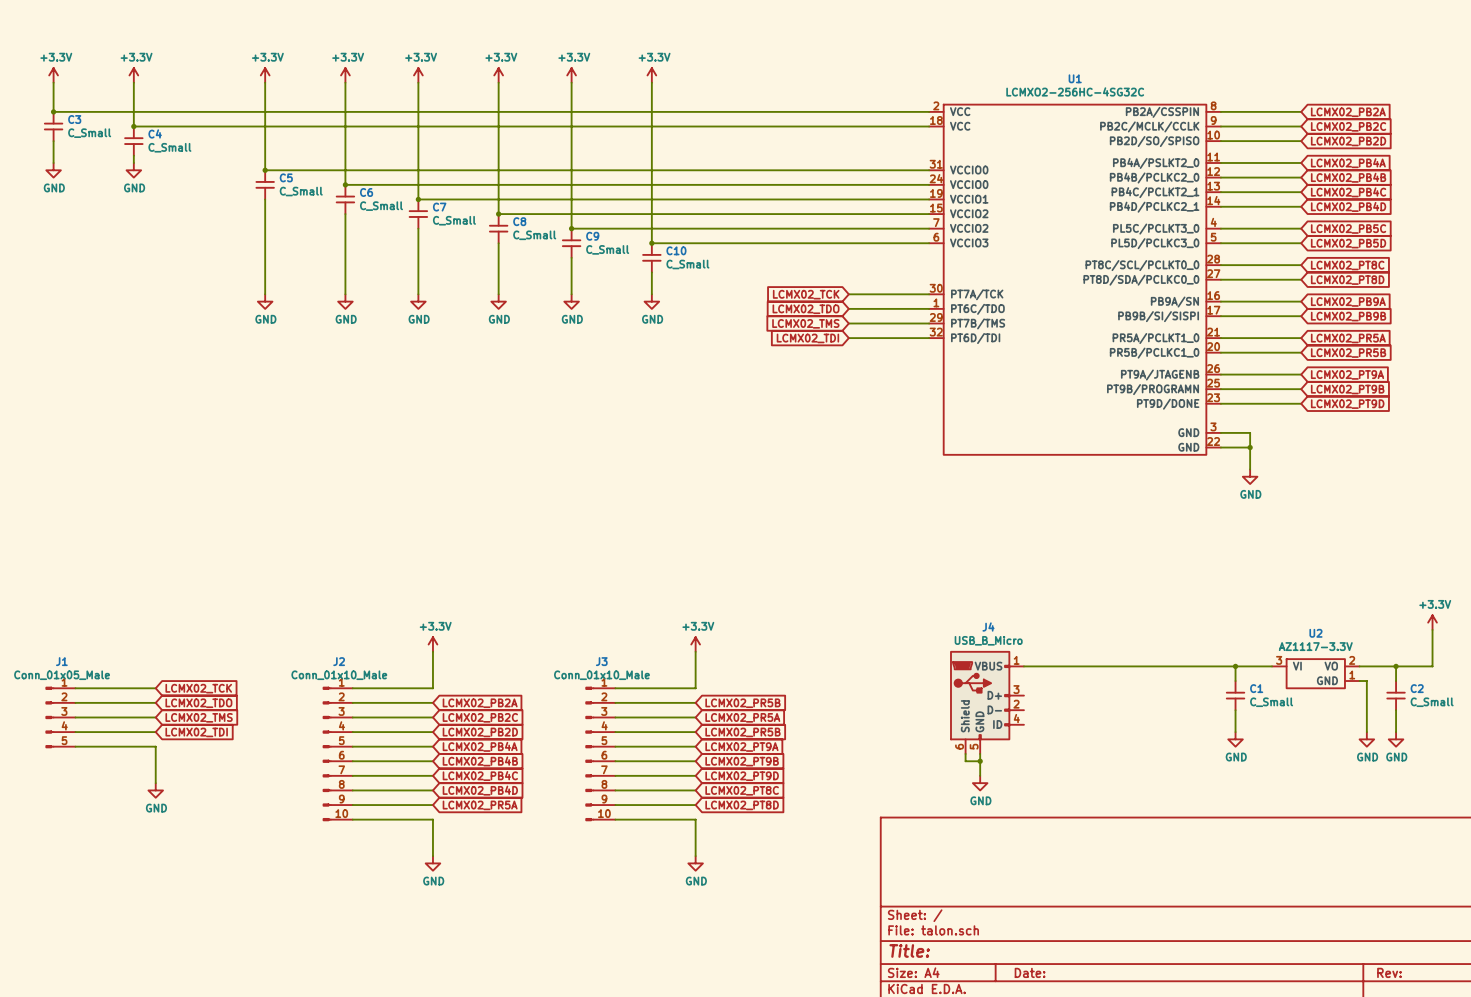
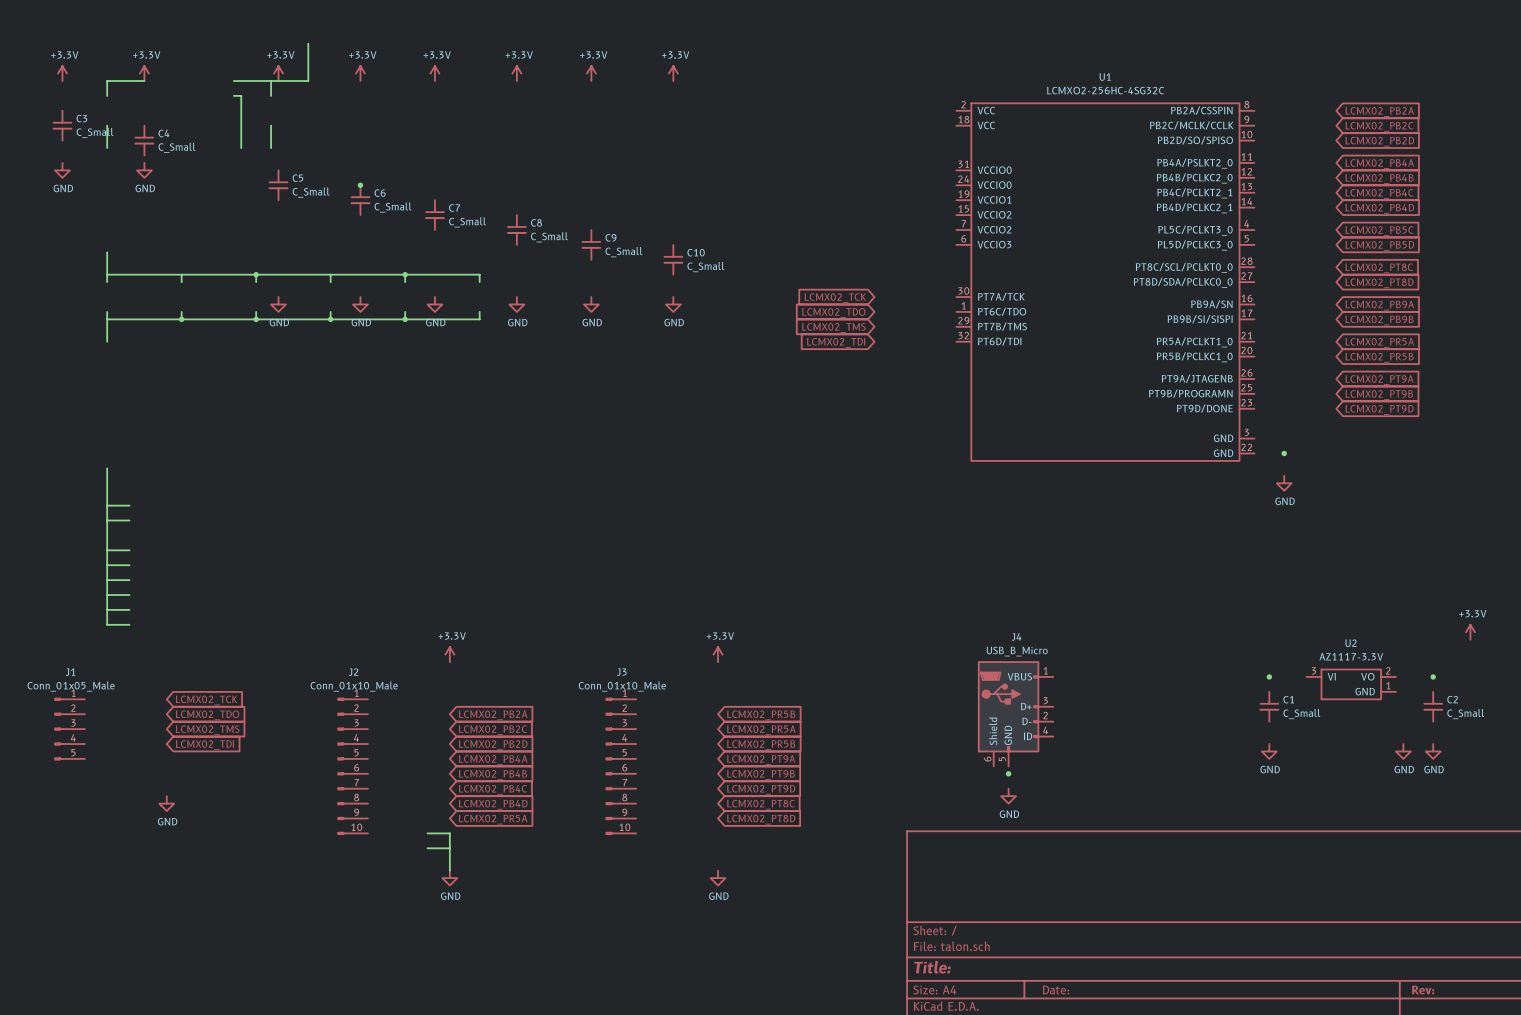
wire: none -> (308, 43) (308, 81) (233, 81)
wire: (53, 82) (53, 111) (929, 111) -> none
wire: (133, 82) (133, 126) (929, 126) -> (144, 81) (107, 81) (107, 95)
wire: none -> (271, 81) (271, 95)
wire: (265, 82) (265, 170) (929, 170) -> none
wire: (345, 82) (345, 184) (929, 184) -> none
wire: (418, 82) (418, 199) (929, 199) -> none
wire: (498, 82) (498, 214) (929, 214) -> none
wire: (571, 82) (571, 228) (929, 228) -> none
wire: (651, 82) (651, 243) (929, 243) -> none
wire: none -> (233, 95) (241, 95) (241, 148)
junction: (53, 111) -> none
wire: (1220, 111) (1301, 111) -> none
junction: (133, 126) -> none
wire: none -> (271, 125) (271, 148)
wire: (1220, 126) (1301, 126) -> none
wire: (53, 141) (53, 162) -> (107, 125) (107, 148)
wire: (1220, 141) (1301, 141) -> none
wire: (133, 155) (133, 162) -> (181, 274) (181, 282)
wire: (1220, 162) (1301, 162) -> none
junction: (265, 170) -> none
wire: (1220, 177) (1301, 177) -> none
wire: (1220, 192) (1301, 192) -> none
wire: (265, 199) (265, 294) -> none
junction: (418, 199) -> none
wire: (1220, 206) (1301, 206) -> none
wire: (345, 214) (345, 294) -> none
junction: (498, 214) -> none
wire: (418, 228) (418, 294) -> none
junction: (571, 228) -> none
wire: (1220, 228) (1301, 228) -> none
wire: (498, 243) (498, 294) -> none
junction: (651, 243) -> none
wire: (1220, 243) (1301, 243) -> none
wire: none -> (107, 252) (107, 282)
wire: (571, 257) (571, 294) -> none
wire: (1220, 265) (1301, 265) -> none
wire: none -> (107, 274) (479, 274) (479, 282)
wire: none -> (256, 274) (256, 282)
junction: none -> (256, 274)
wire: none -> (330, 274) (330, 282)
wire: none -> (405, 274) (405, 282)
junction: none -> (405, 274)
wire: (651, 272) (651, 294) -> none
wire: (1220, 279) (1301, 279) -> none
wire: (848, 294) (929, 294) -> none
wire: (1220, 301) (1301, 301) -> none
wire: none -> (107, 311) (107, 341)
wire: none -> (181, 311) (181, 319)
wire: none -> (256, 311) (256, 319)
wire: none -> (330, 311) (330, 319)
wire: none -> (405, 311) (405, 319)
wire: none -> (479, 311) (479, 319) (107, 319)
wire: (848, 308) (929, 308) -> none
junction: none -> (181, 319)
junction: none -> (256, 319)
junction: none -> (330, 319)
junction: none -> (405, 319)
wire: (1220, 316) (1301, 316) -> none
wire: (848, 323) (929, 323) -> none
wire: (848, 338) (929, 338) -> none
wire: (1220, 338) (1301, 338) -> none
wire: (1220, 352) (1301, 352) -> none
wire: (1220, 374) (1301, 374) -> none
wire: (1220, 389) (1301, 389) -> none
wire: (1220, 403) (1301, 403) -> none
wire: (1220, 432) (1250, 432) (1250, 469) -> none
wire: (1220, 447) (1250, 447) -> none
wire: none -> (107, 468) (107, 624) (129, 624)
wire: none -> (107, 505) (129, 505)
wire: none -> (107, 520) (129, 520)
wire: none -> (107, 550) (129, 550)
wire: none -> (107, 565) (129, 565)
wire: none -> (107, 580) (129, 580)
wire: none -> (107, 595) (129, 595)
wire: none -> (107, 609) (129, 609)
wire: (1432, 629) (1432, 666) (1359, 666) -> none
wire: (432, 651) (432, 688) (352, 688) -> none
wire: (695, 651) (695, 688) (615, 688) -> none
wire: (1023, 666) (1272, 666) -> none
wire: (1235, 666) (1235, 681) -> none
wire: (1396, 666) (1396, 681) -> none
wire: (1359, 681) (1366, 681) (1366, 732) -> none
wire: (75, 688) (155, 688) -> none
wire: (75, 702) (155, 702) -> none
wire: (352, 702) (432, 702) -> none
wire: (615, 702) (695, 702) -> none
wire: (1235, 710) (1235, 732) -> none
wire: (1396, 710) (1396, 732) -> none
wire: (75, 717) (155, 717) -> none
wire: (352, 717) (432, 717) -> none
wire: (615, 717) (695, 717) -> none
wire: (75, 732) (155, 732) -> none
wire: (352, 732) (432, 732) -> none
wire: (615, 732) (695, 732) -> none
wire: (75, 746) (155, 746) (155, 783) -> none
wire: (352, 746) (432, 746) -> none
wire: (615, 746) (695, 746) -> none
wire: (965, 753) (965, 761) (980, 761) -> none
wire: (980, 753) (980, 775) -> none
wire: (352, 761) (432, 761) -> none
wire: (615, 761) (695, 761) -> none
wire: (352, 775) (432, 775) -> none
wire: (615, 775) (695, 775) -> none
wire: (352, 790) (432, 790) -> none
wire: (615, 790) (695, 790) -> none
wire: (352, 805) (432, 805) -> none
wire: (615, 805) (695, 805) -> none
wire: (352, 819) (411, 819) -> none
wire: (615, 819) (695, 819) (695, 856) -> none
wire: none -> (427, 848) (449, 848)

